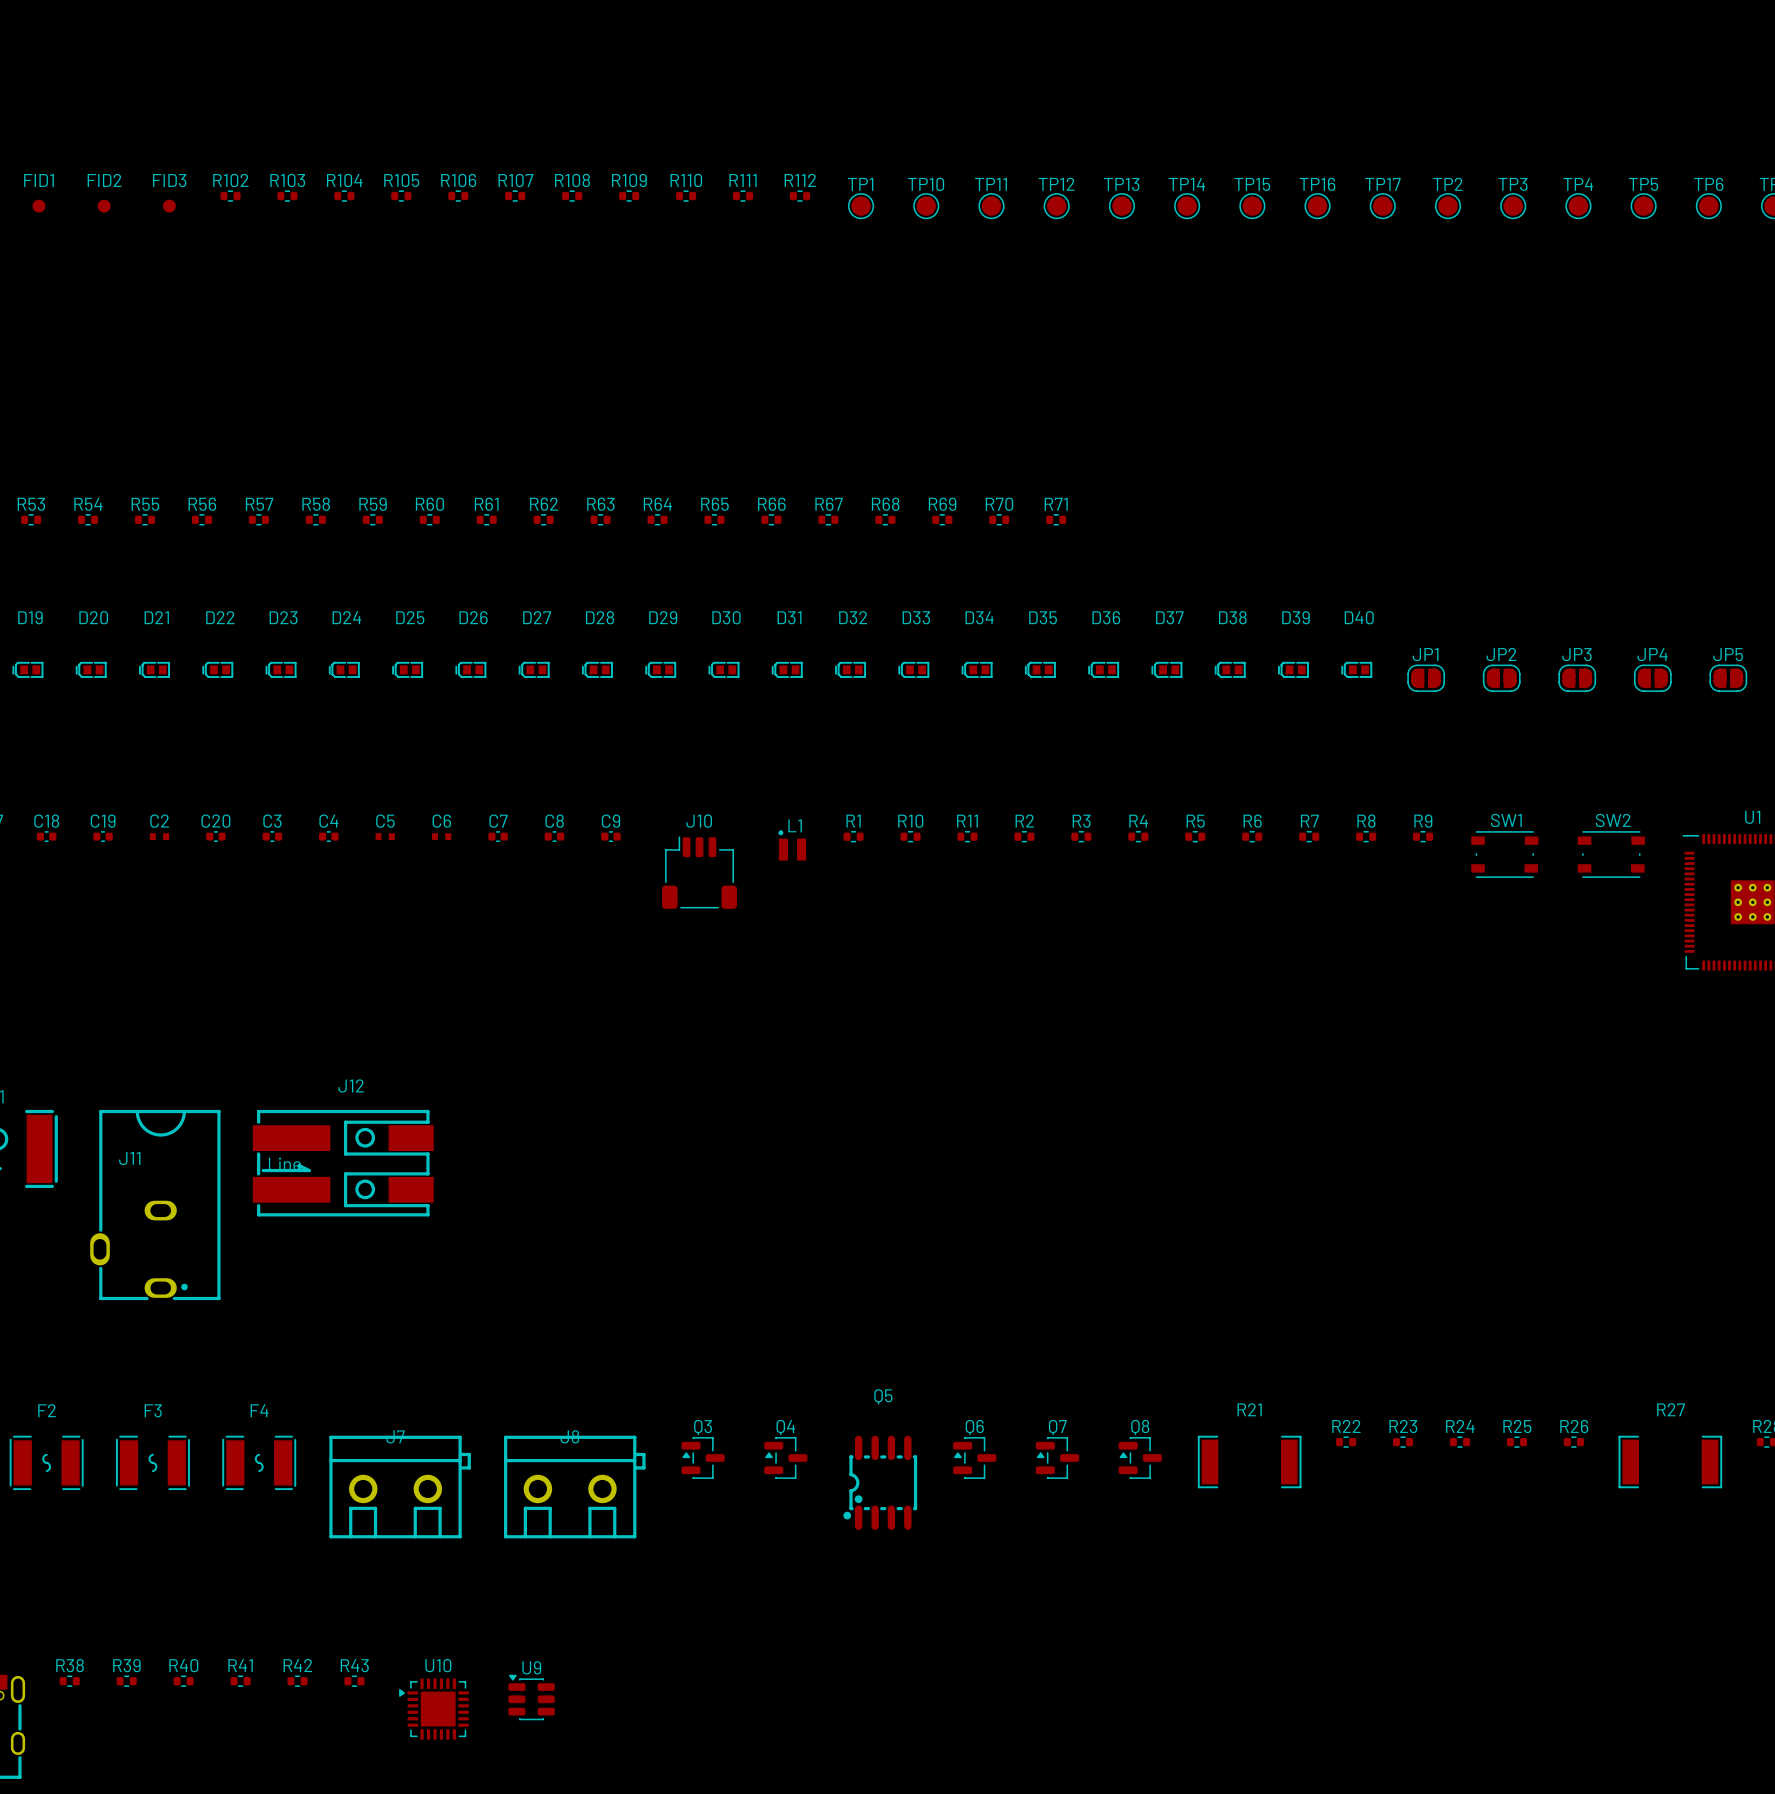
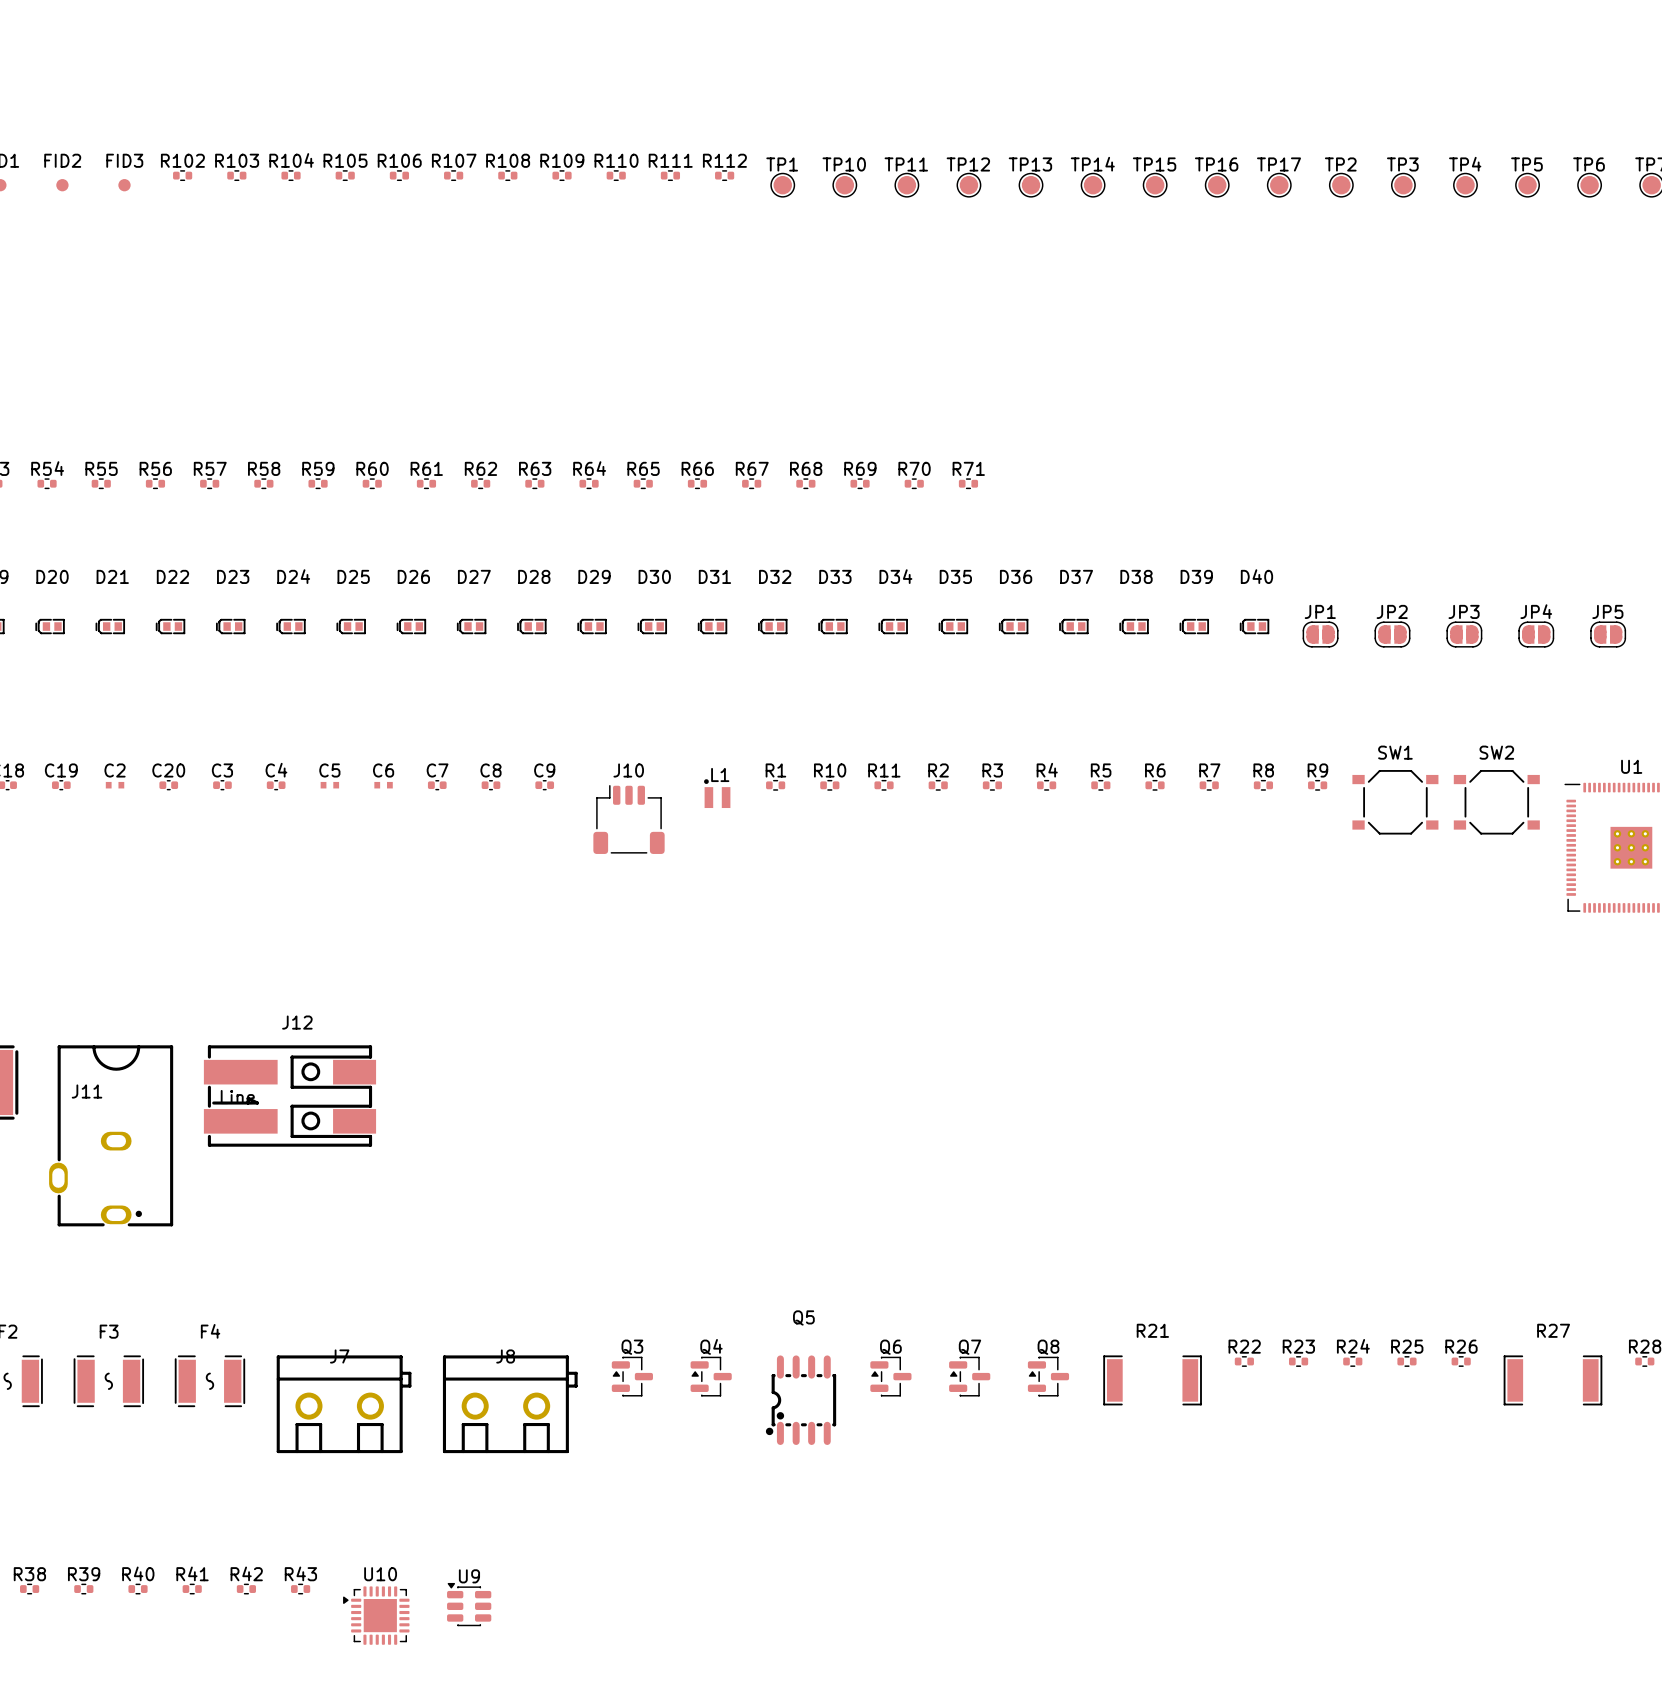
SW1 footprint: [1471, 831, 1539, 878] -> [1352, 770, 1439, 835]
SW2 footprint: [1577, 831, 1645, 878] -> [1453, 770, 1540, 835]

